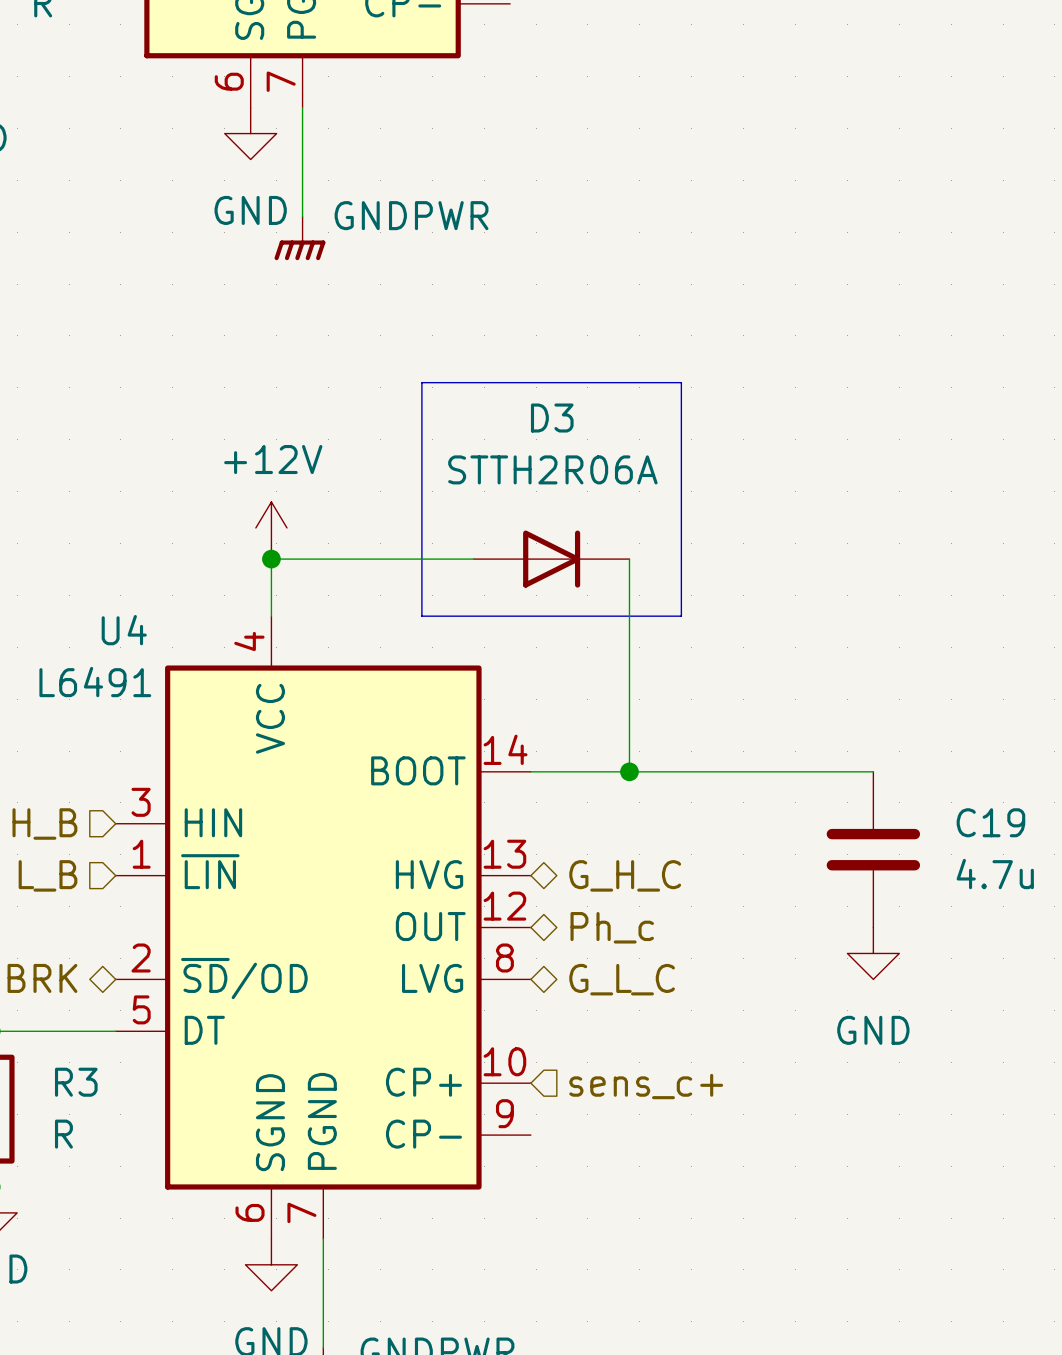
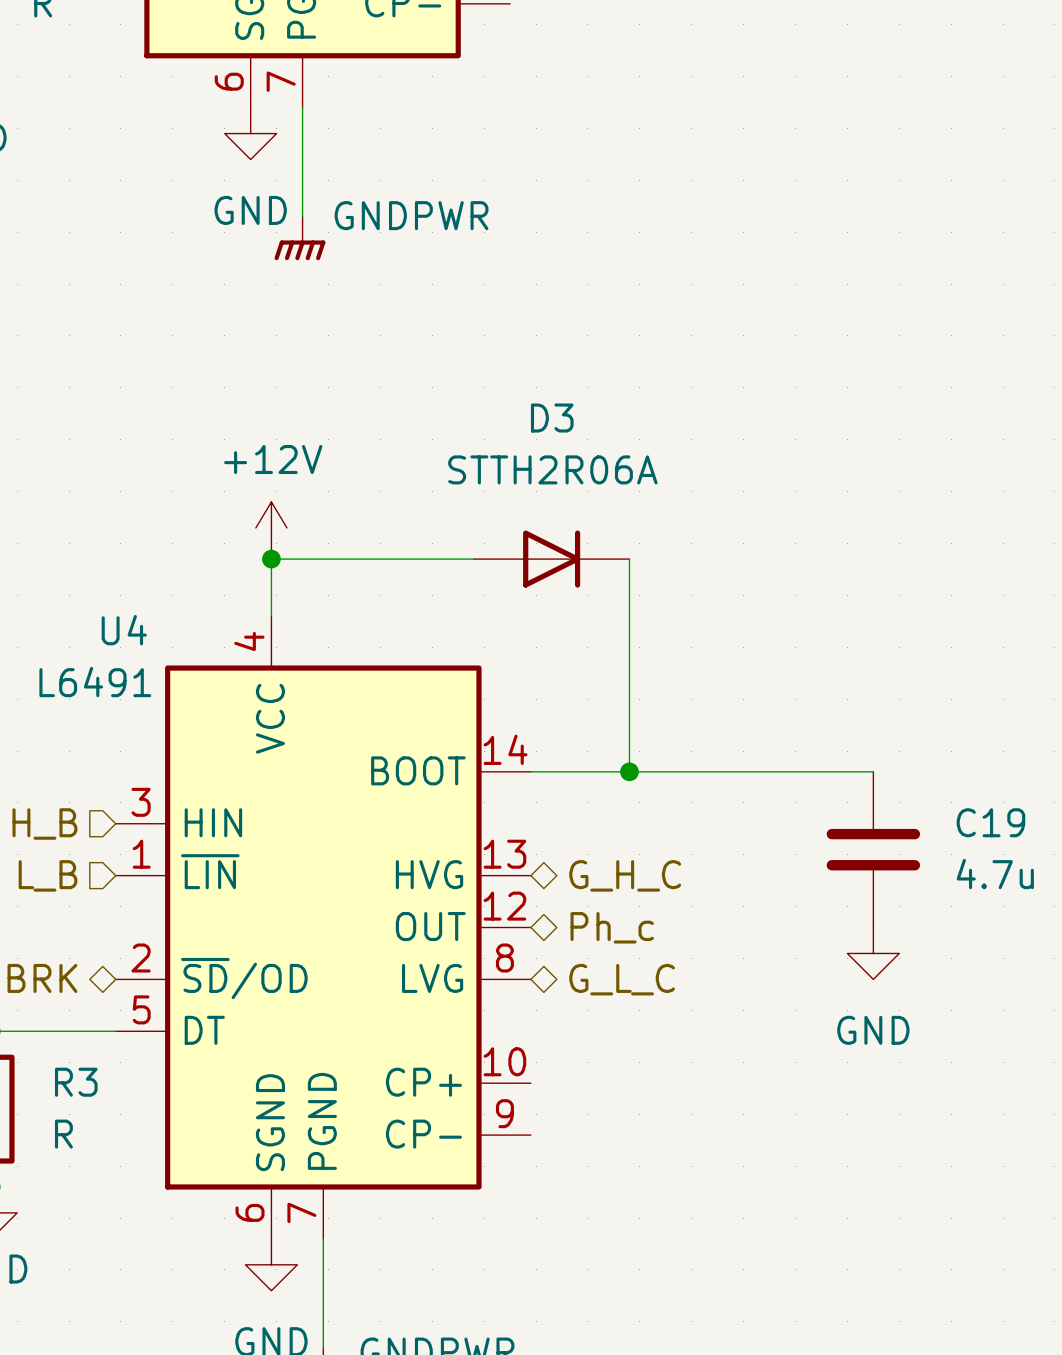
line: (421, 382) (681, 382) (681, 616) (421, 616) (421, 382) -> none
hierarchical label: sens_c+ (646, 1086) -> none

